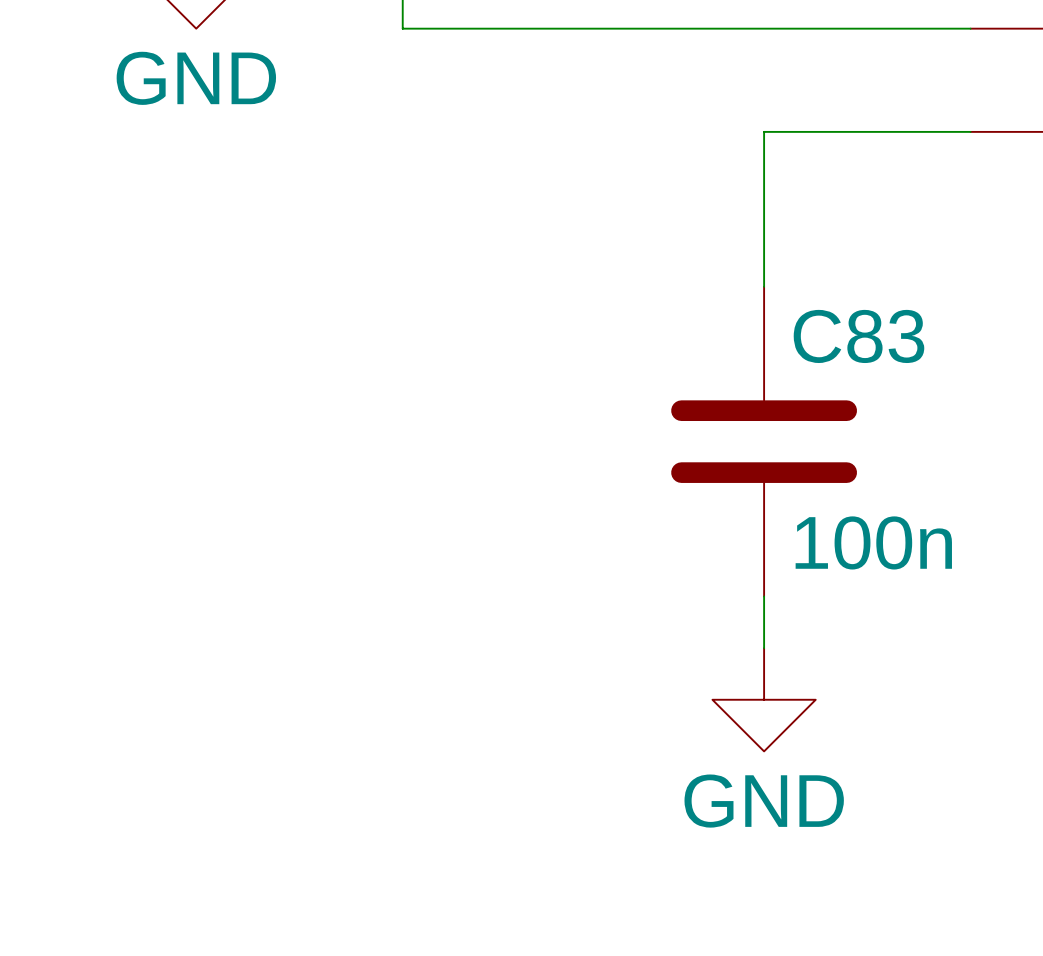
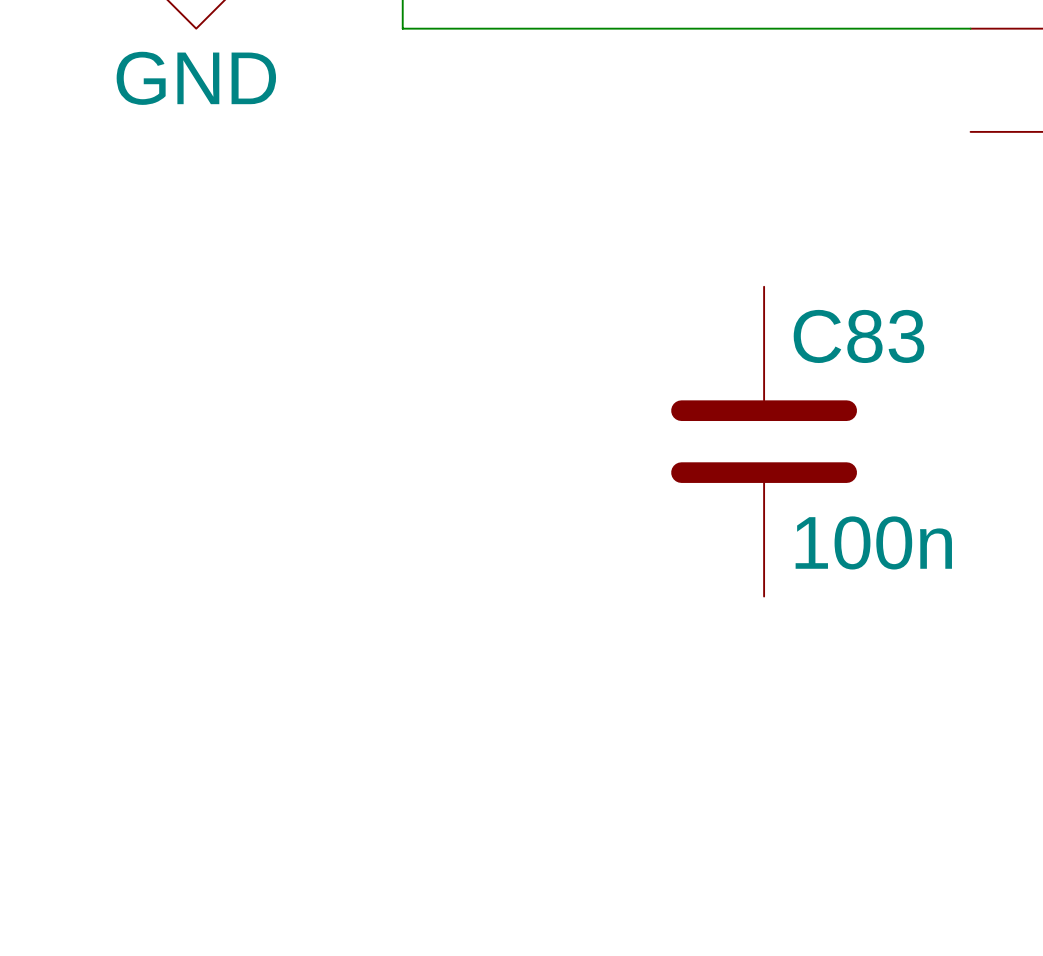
wire: (970, 131) (764, 131) (764, 286) -> none
wire: (764, 596) (764, 648) -> none
power symbol: GND (764, 699) -> none

